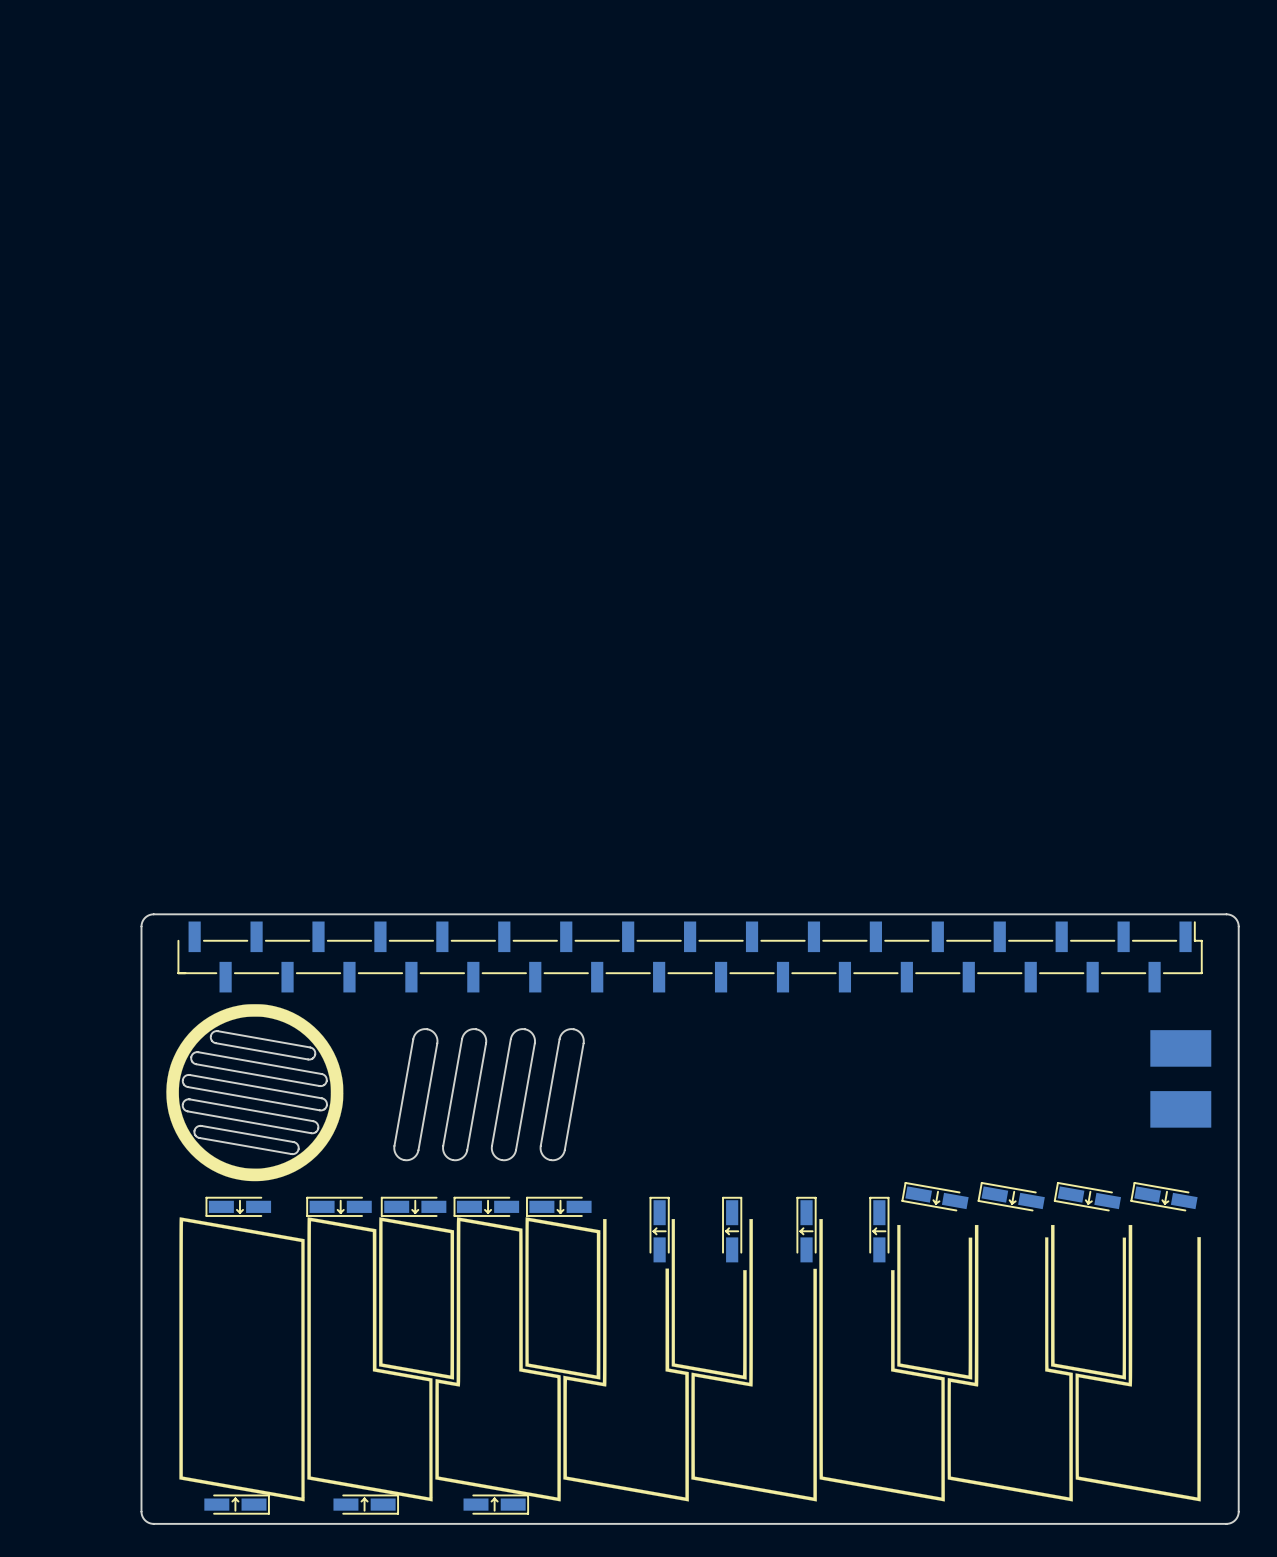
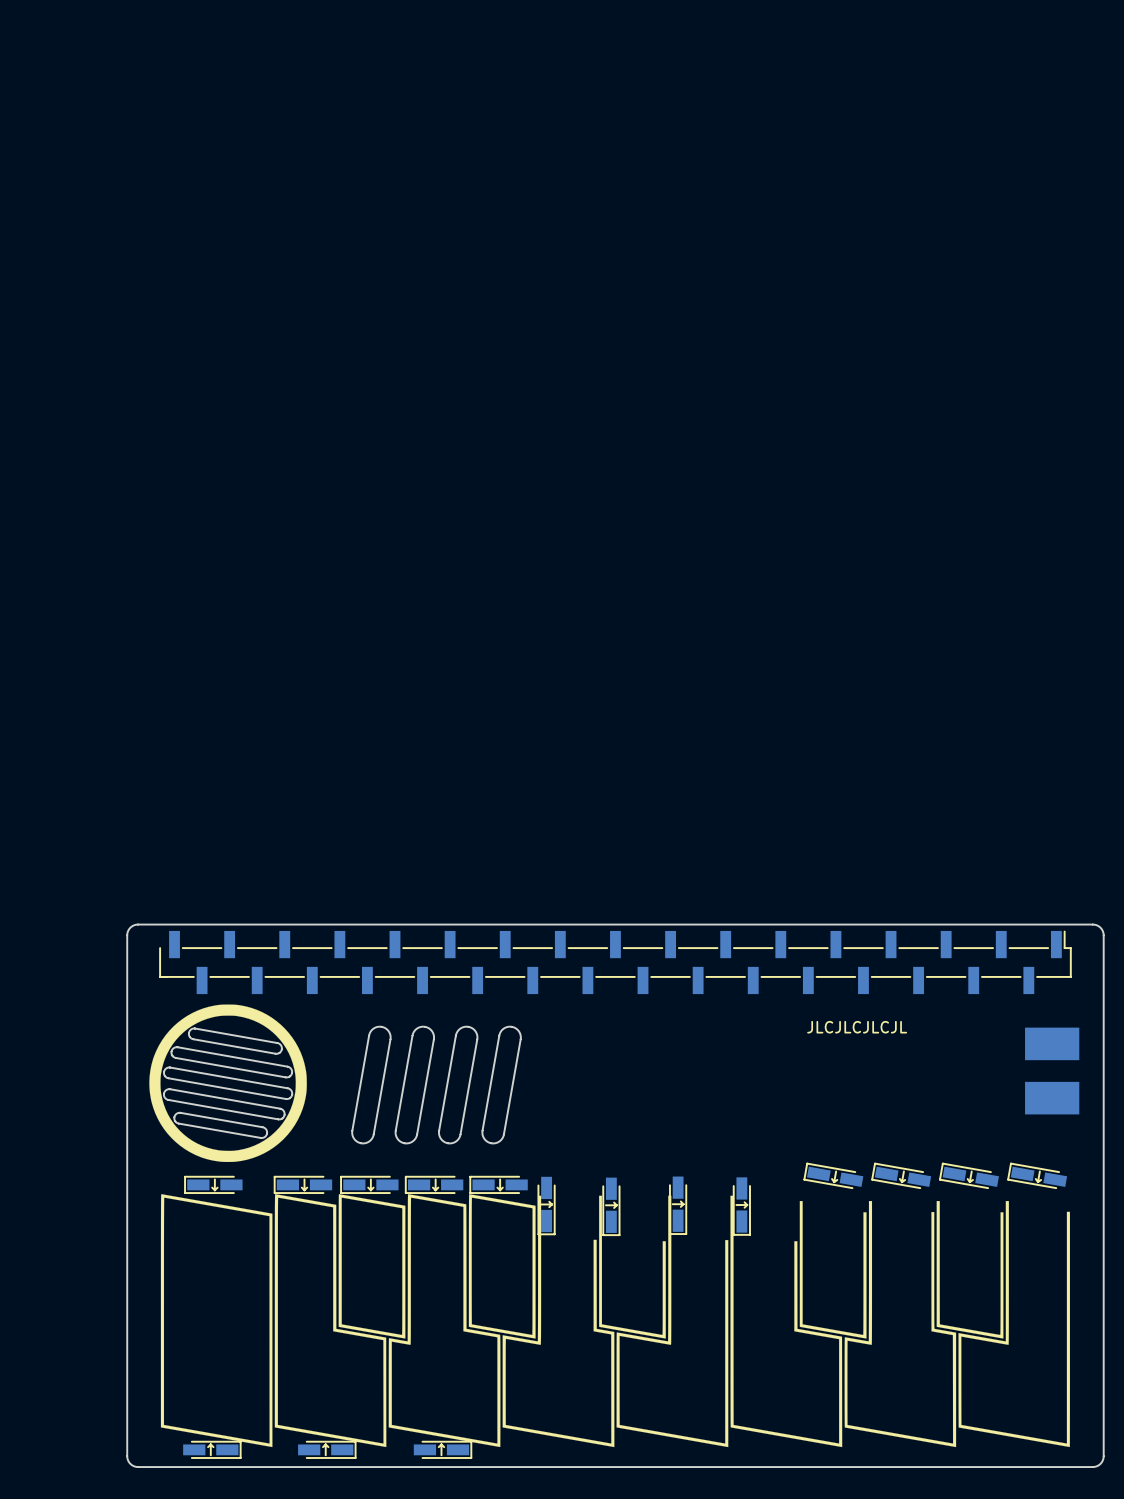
text: none -> JLCJLCJLCJL (857, 1027)
part: (659, 1229) -> none
part: (732, 1229) -> none
part: (806, 1229) -> none
part: (879, 1229) -> none
part: none -> (546, 1205)
part: none -> (678, 1205)
part: none -> (611, 1206)
part: none -> (741, 1206)

